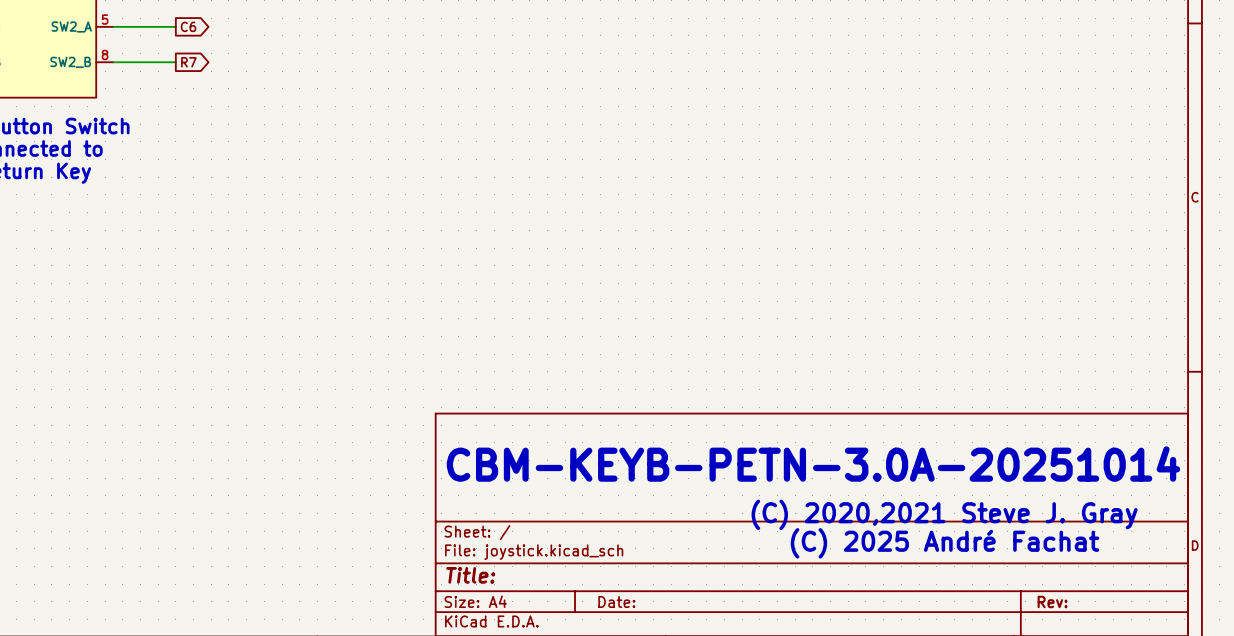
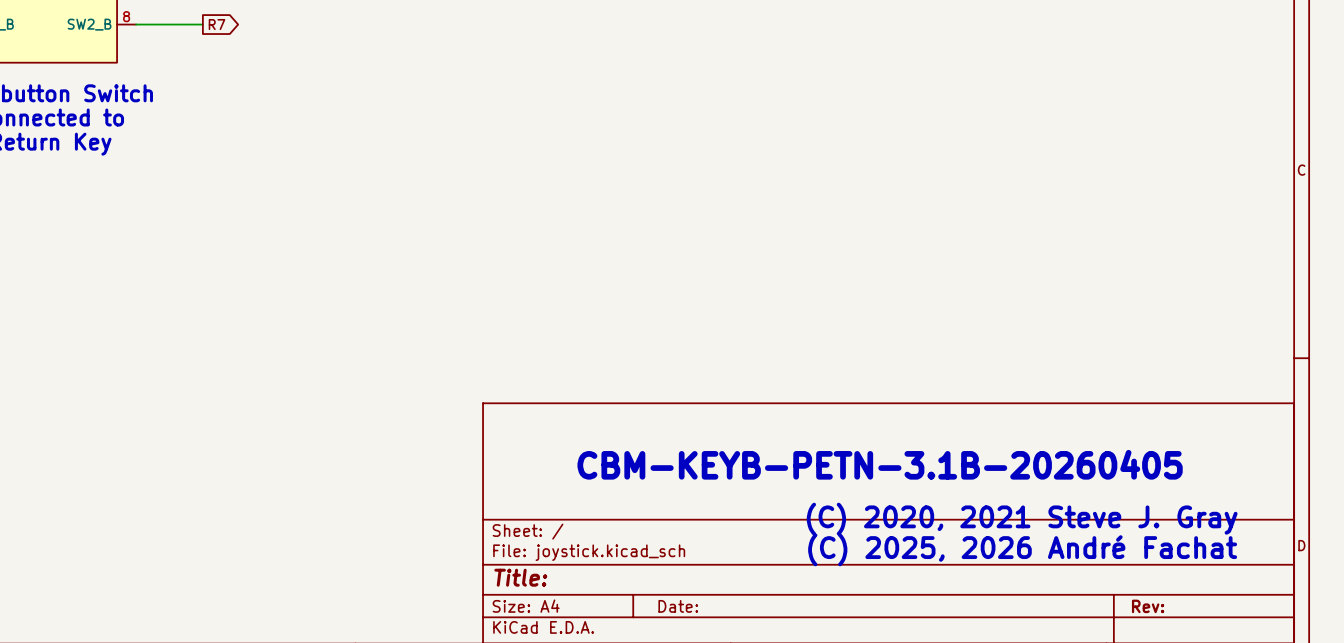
text: CBM-KEYB-PETN-3.0A-20251014 (813, 464) -> CBM-KEYB-PETN-3.1B-20260405 (880, 464)
text: (C) 2020,2021 Steve J. Gray (944, 514) -> (C) 2020, 2021 Steve J. Gray (1022, 519)
text: (C) 2025 André Fachat (945, 543) -> (C) 2025, 2026 André Fachat (1022, 549)

